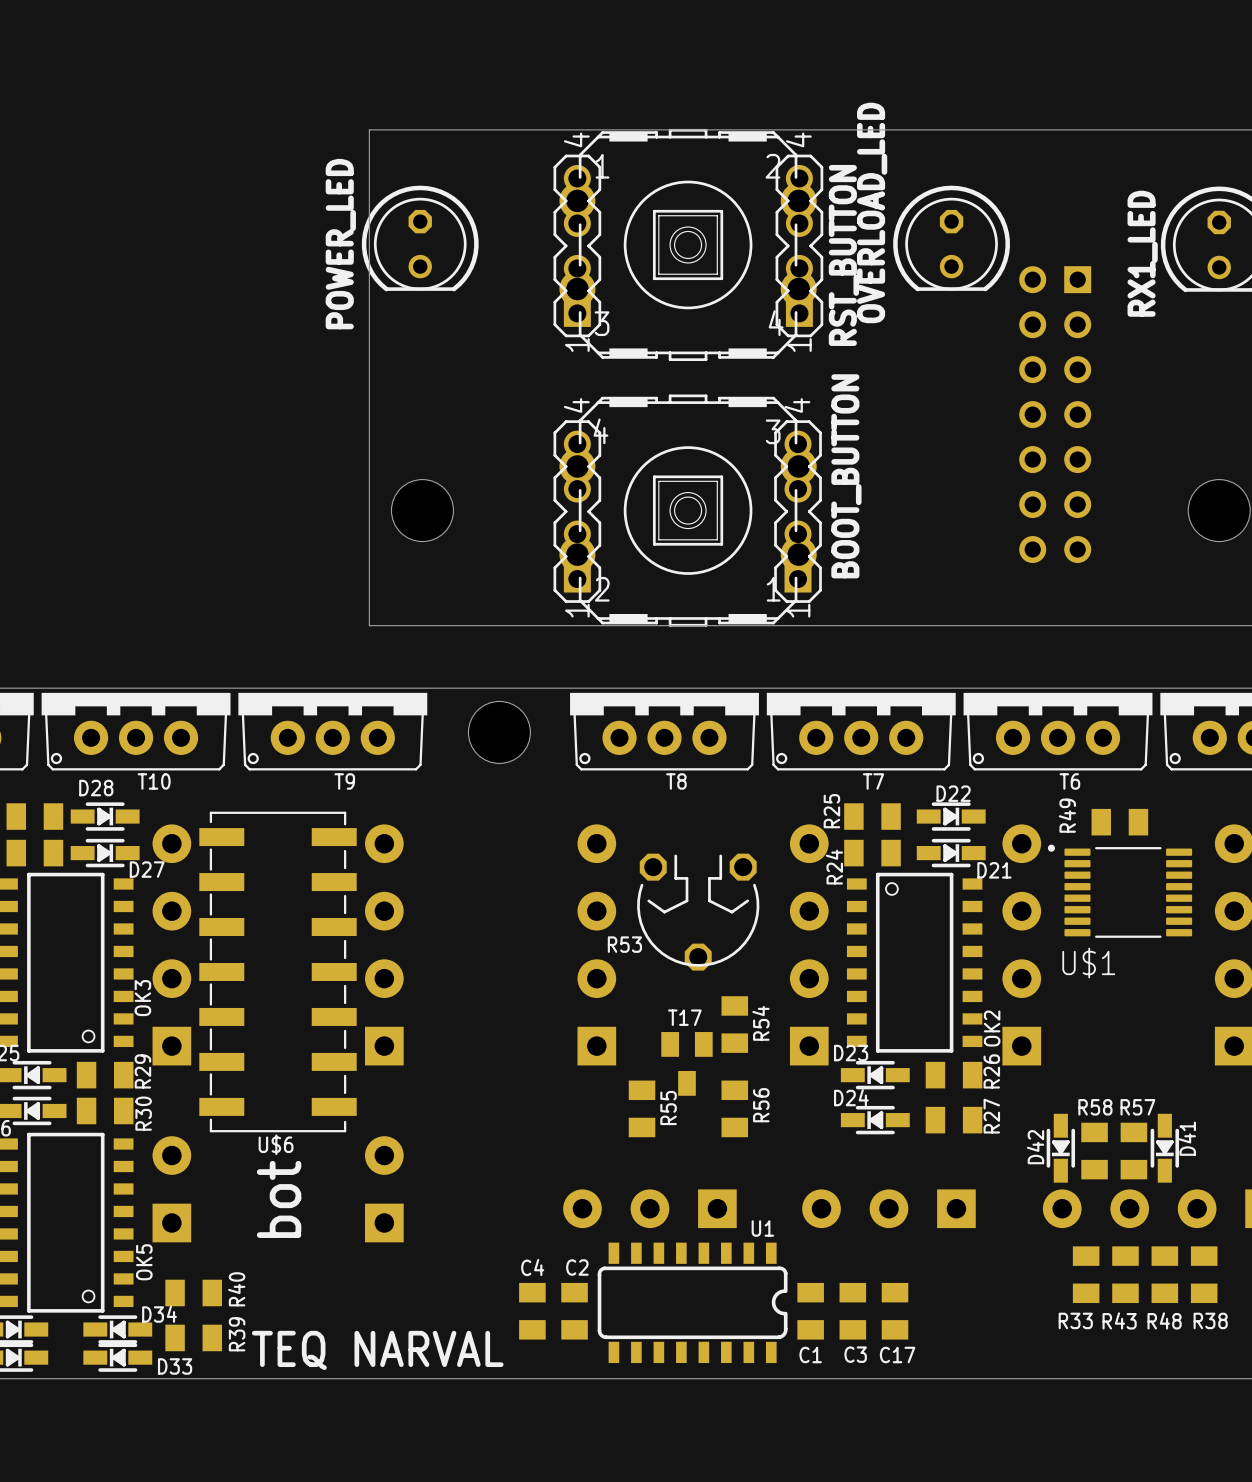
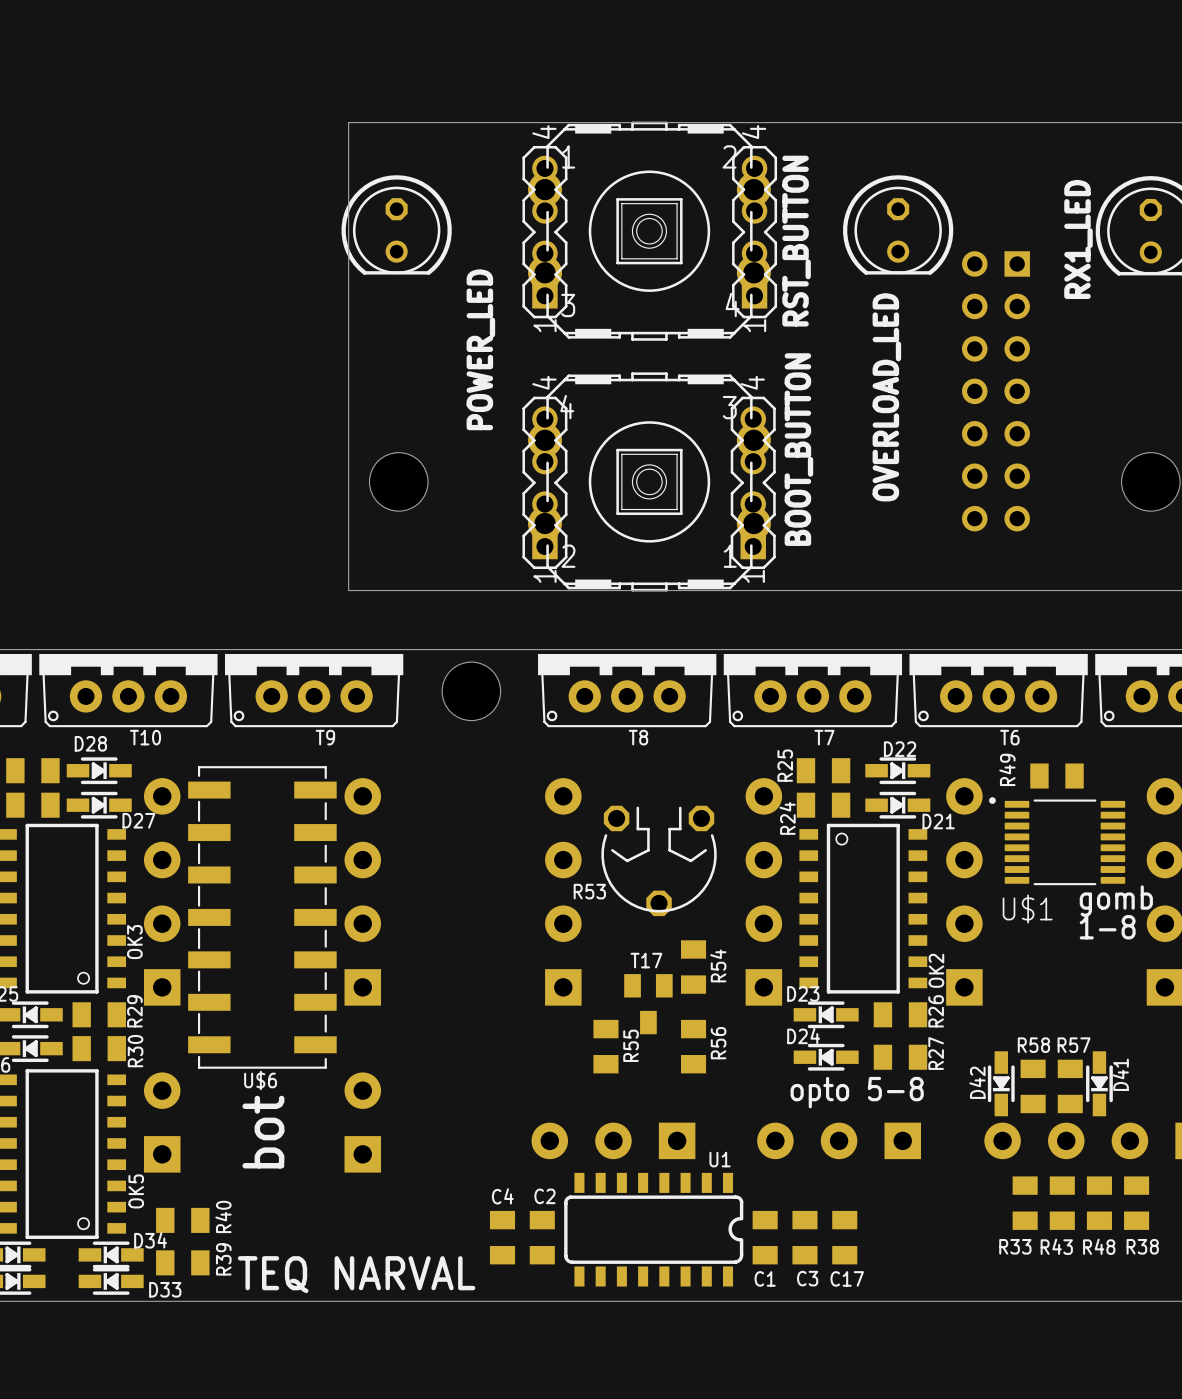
OVERLOAD_LED name position: OVERLOAD_LED (872, 212) -> OVERLOAD_LED (886, 397)
POWER_LED name position: POWER_LED (340, 244) -> POWER_LED (480, 349)
text: none -> gomb (1116, 901)
text: none -> 1-8 (1107, 927)
text: none -> opto 5-8 (857, 1092)

